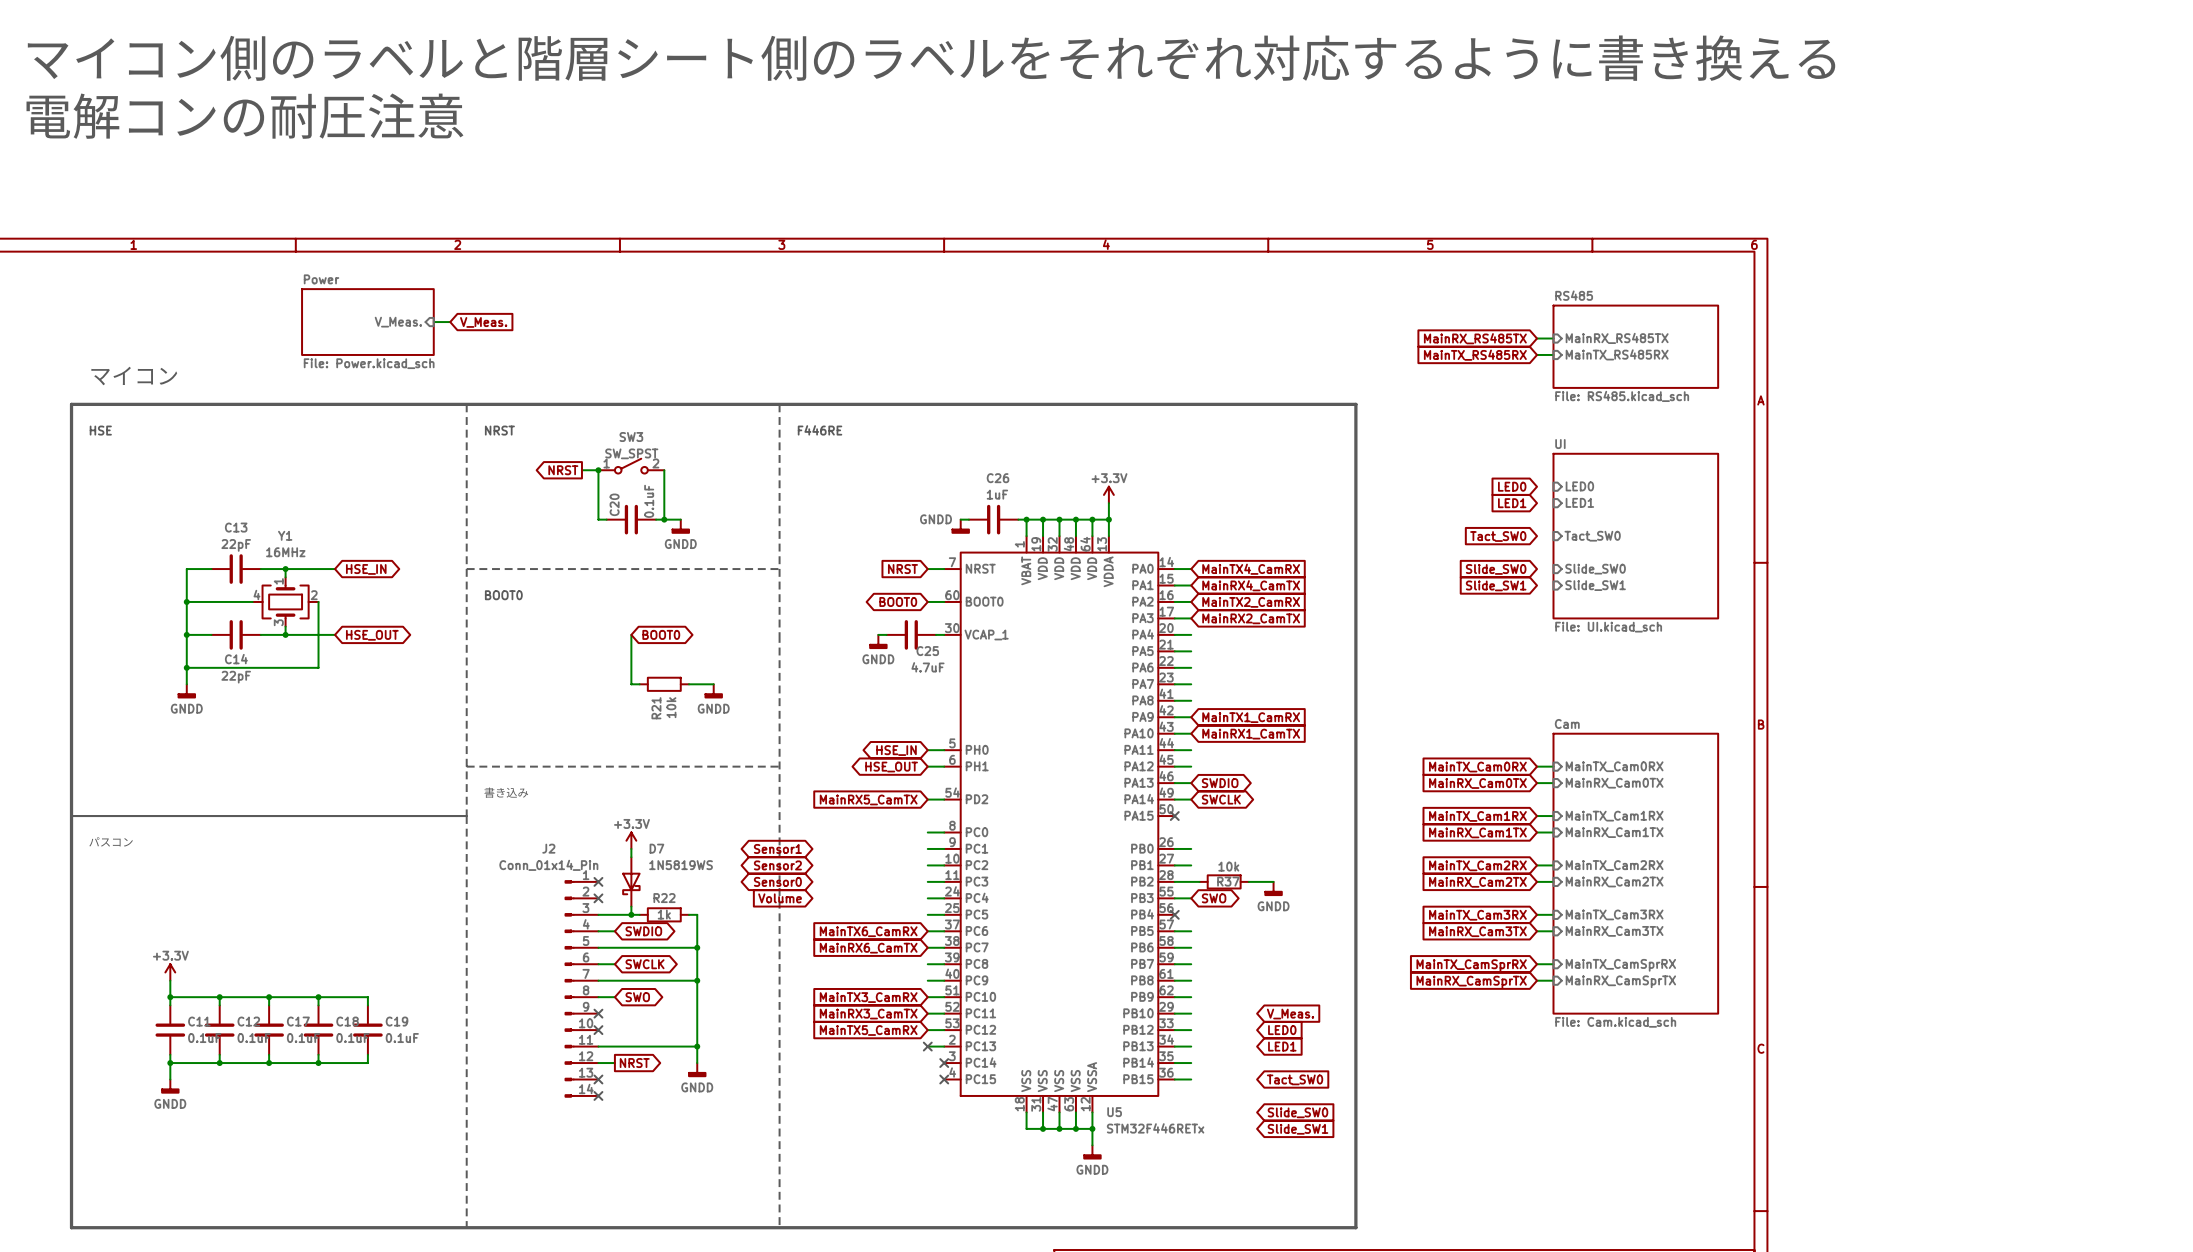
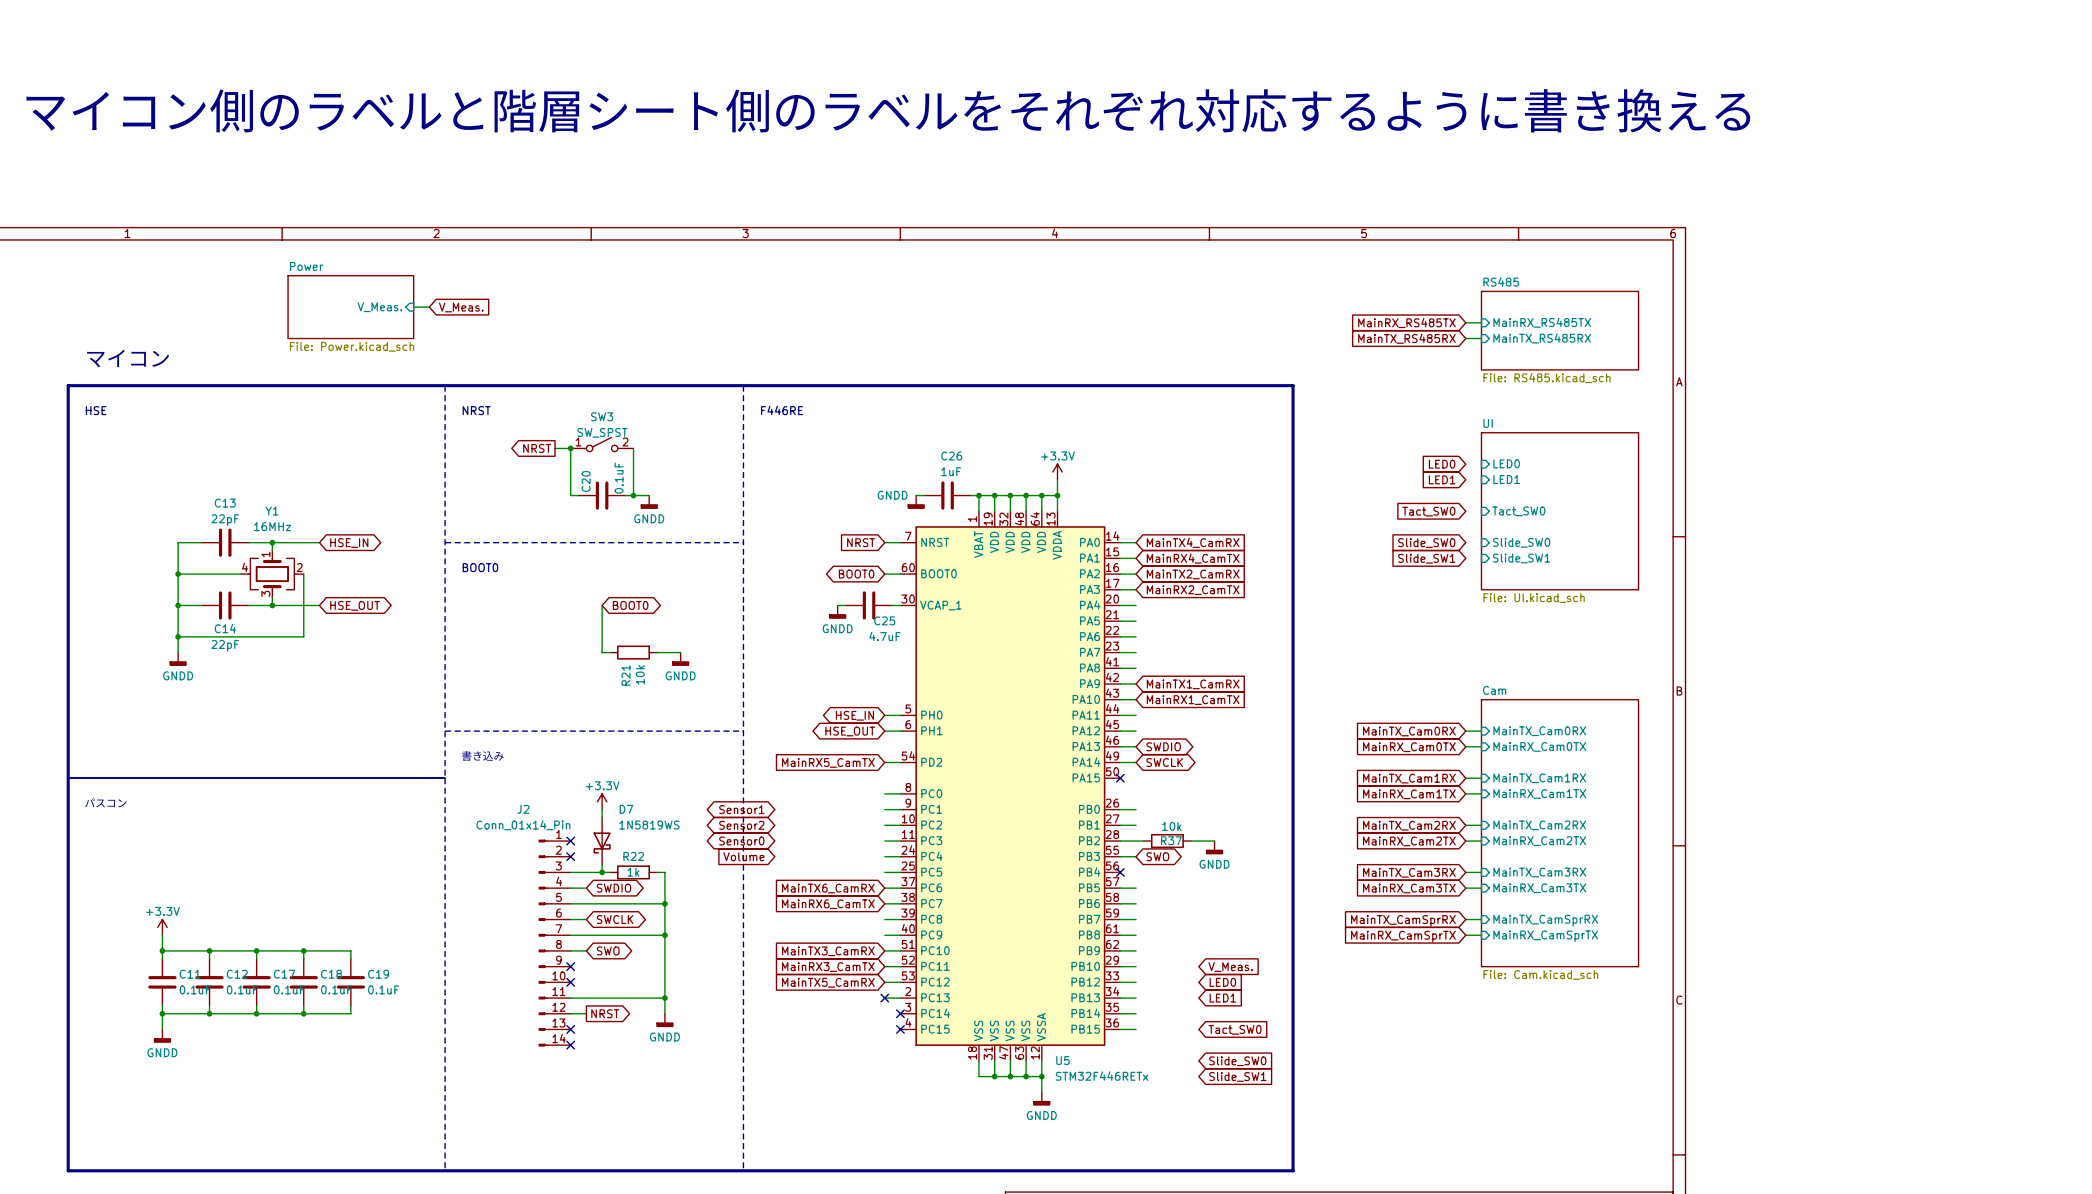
text: マイコン側のラベルと階層シート側のラベルをそれぞれ対応するように書き換える (931, 58) -> none
text: 電解コンの耐圧注意 (244, 116) -> マイコン側のラベルと階層シート側のラベルをそれぞれ対応するように書き換える (888, 110)

